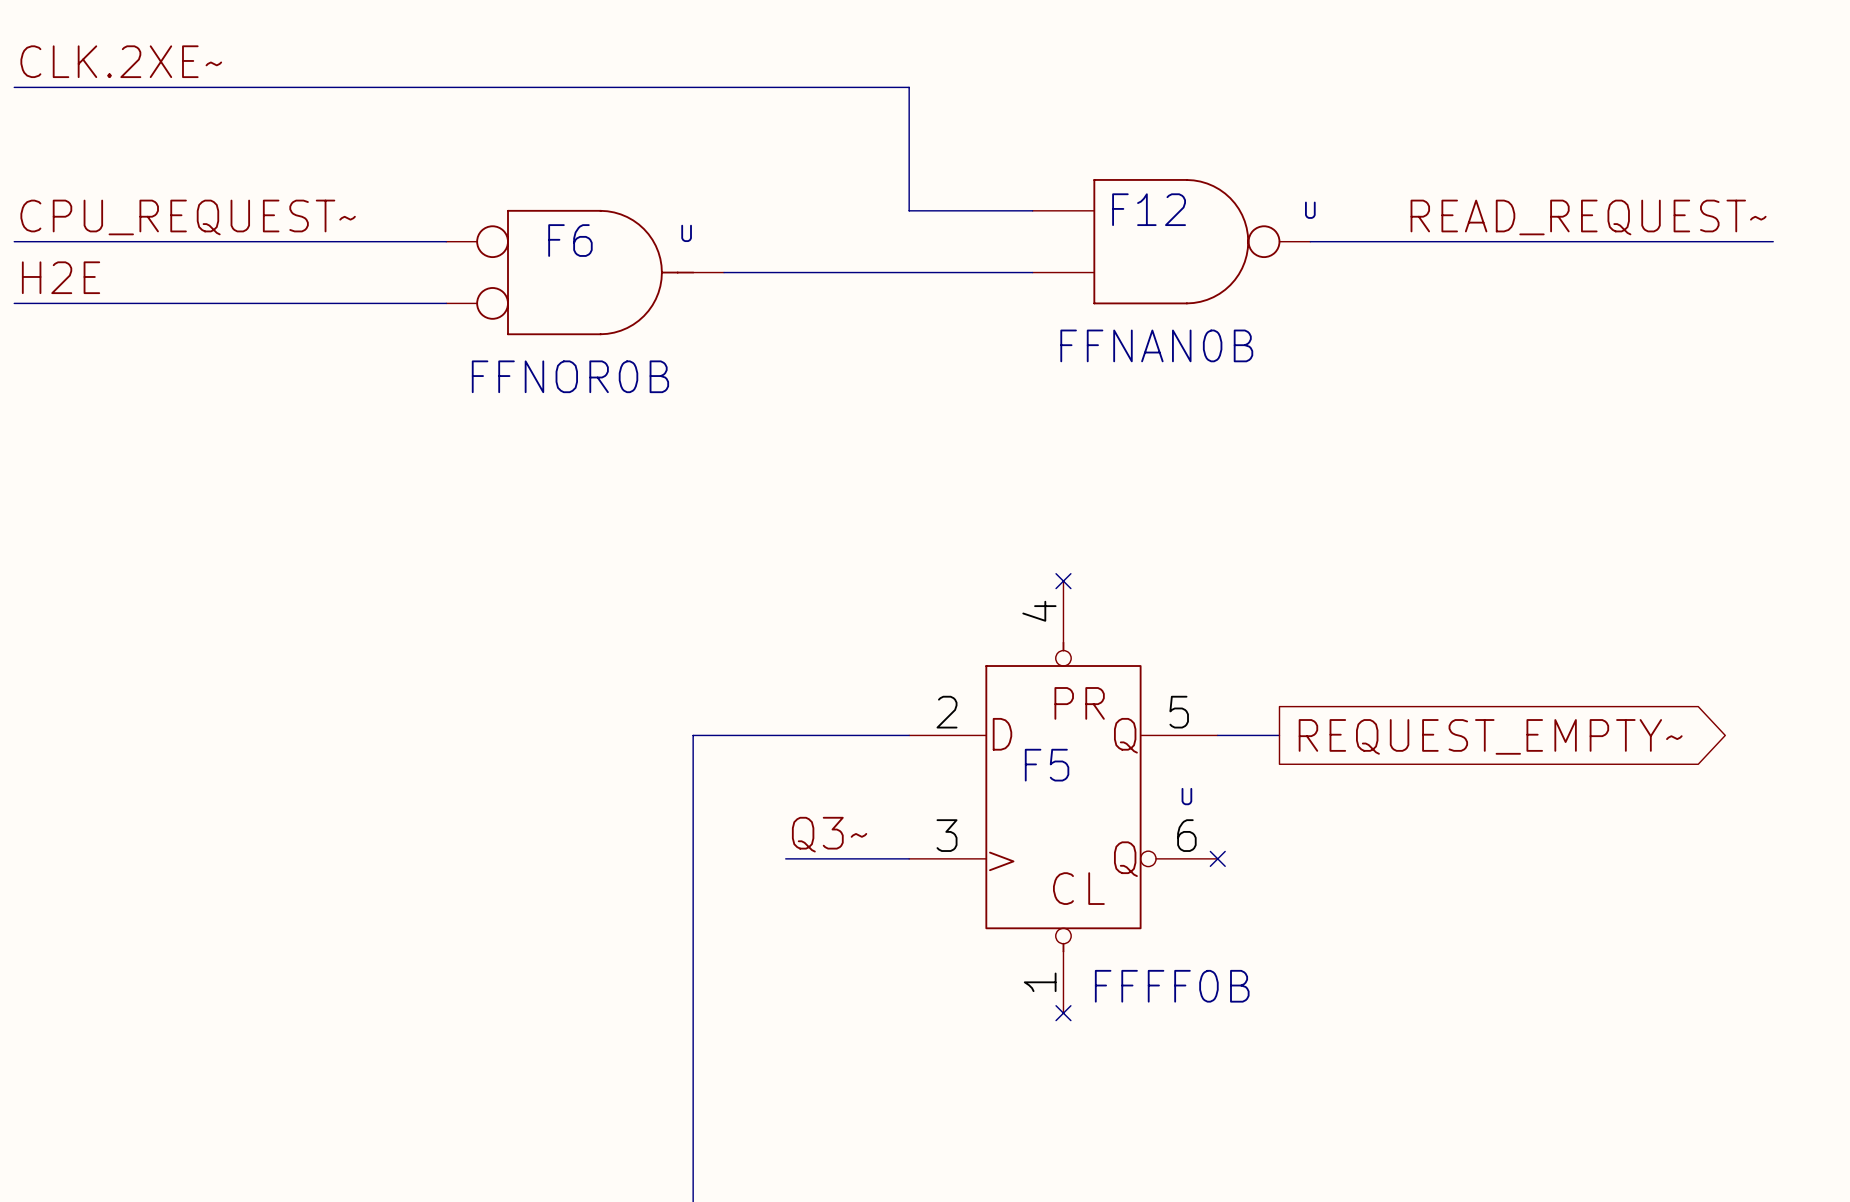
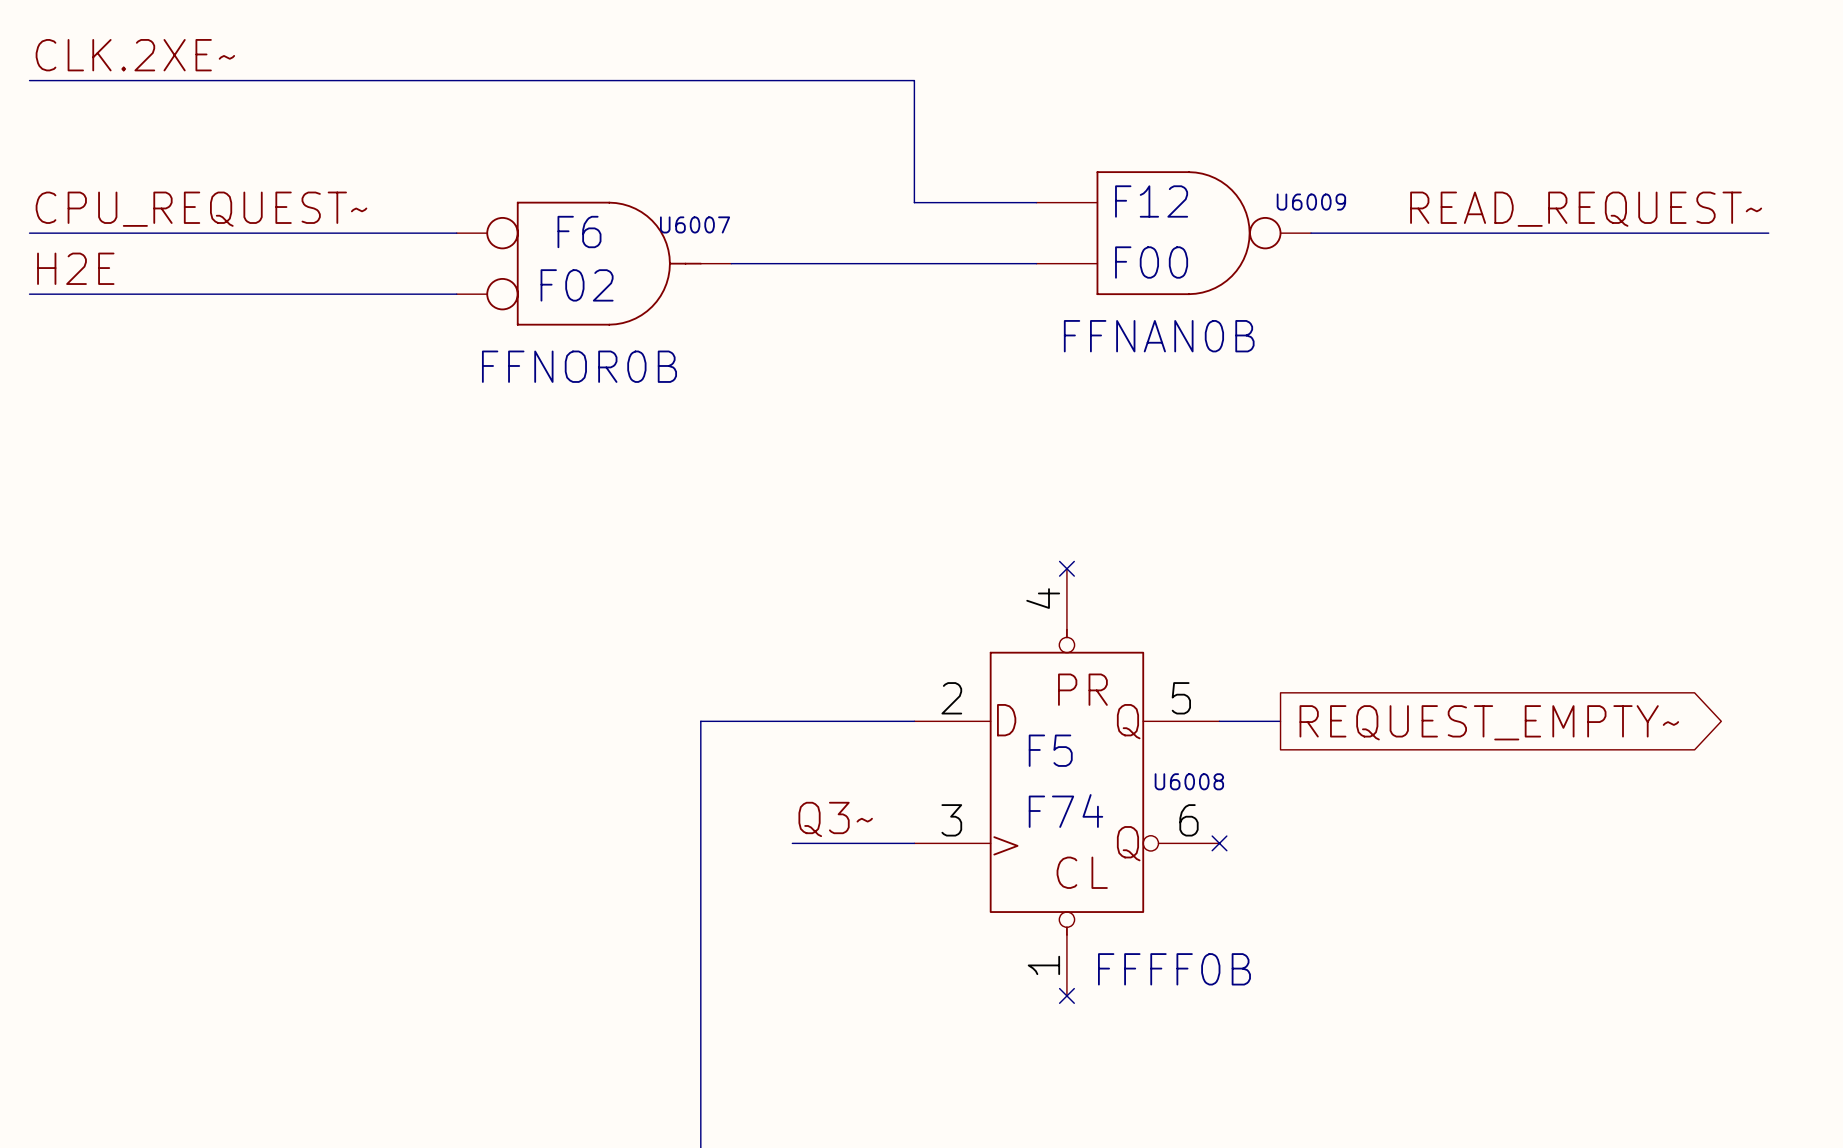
U name: U (1310, 210) -> U6009 (1311, 202)
U name: U (686, 233) -> U6007 (695, 224)
U value: none -> F00 (1151, 262)
U value: none -> F02 (577, 285)
U name: U (1186, 796) -> U6008 (1189, 781)
U value: none -> F74 (1065, 811)

